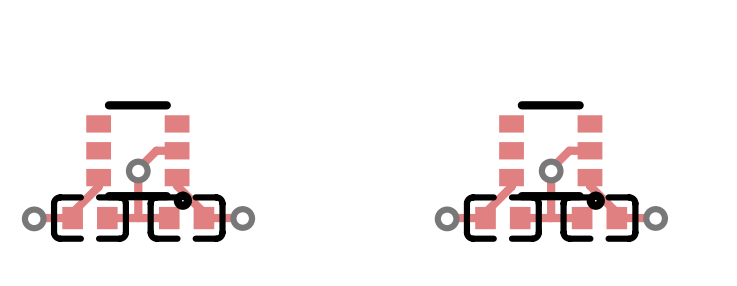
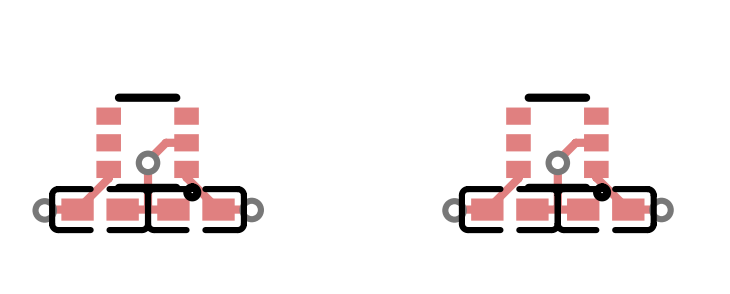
part footprint: [50, 194, 129, 242] -> [49, 186, 152, 234]
part footprint: [147, 194, 226, 242] -> [144, 186, 247, 234]
part footprint: [463, 194, 542, 242] -> [458, 186, 561, 234]
part footprint: [560, 194, 639, 242] -> [554, 186, 657, 234]

